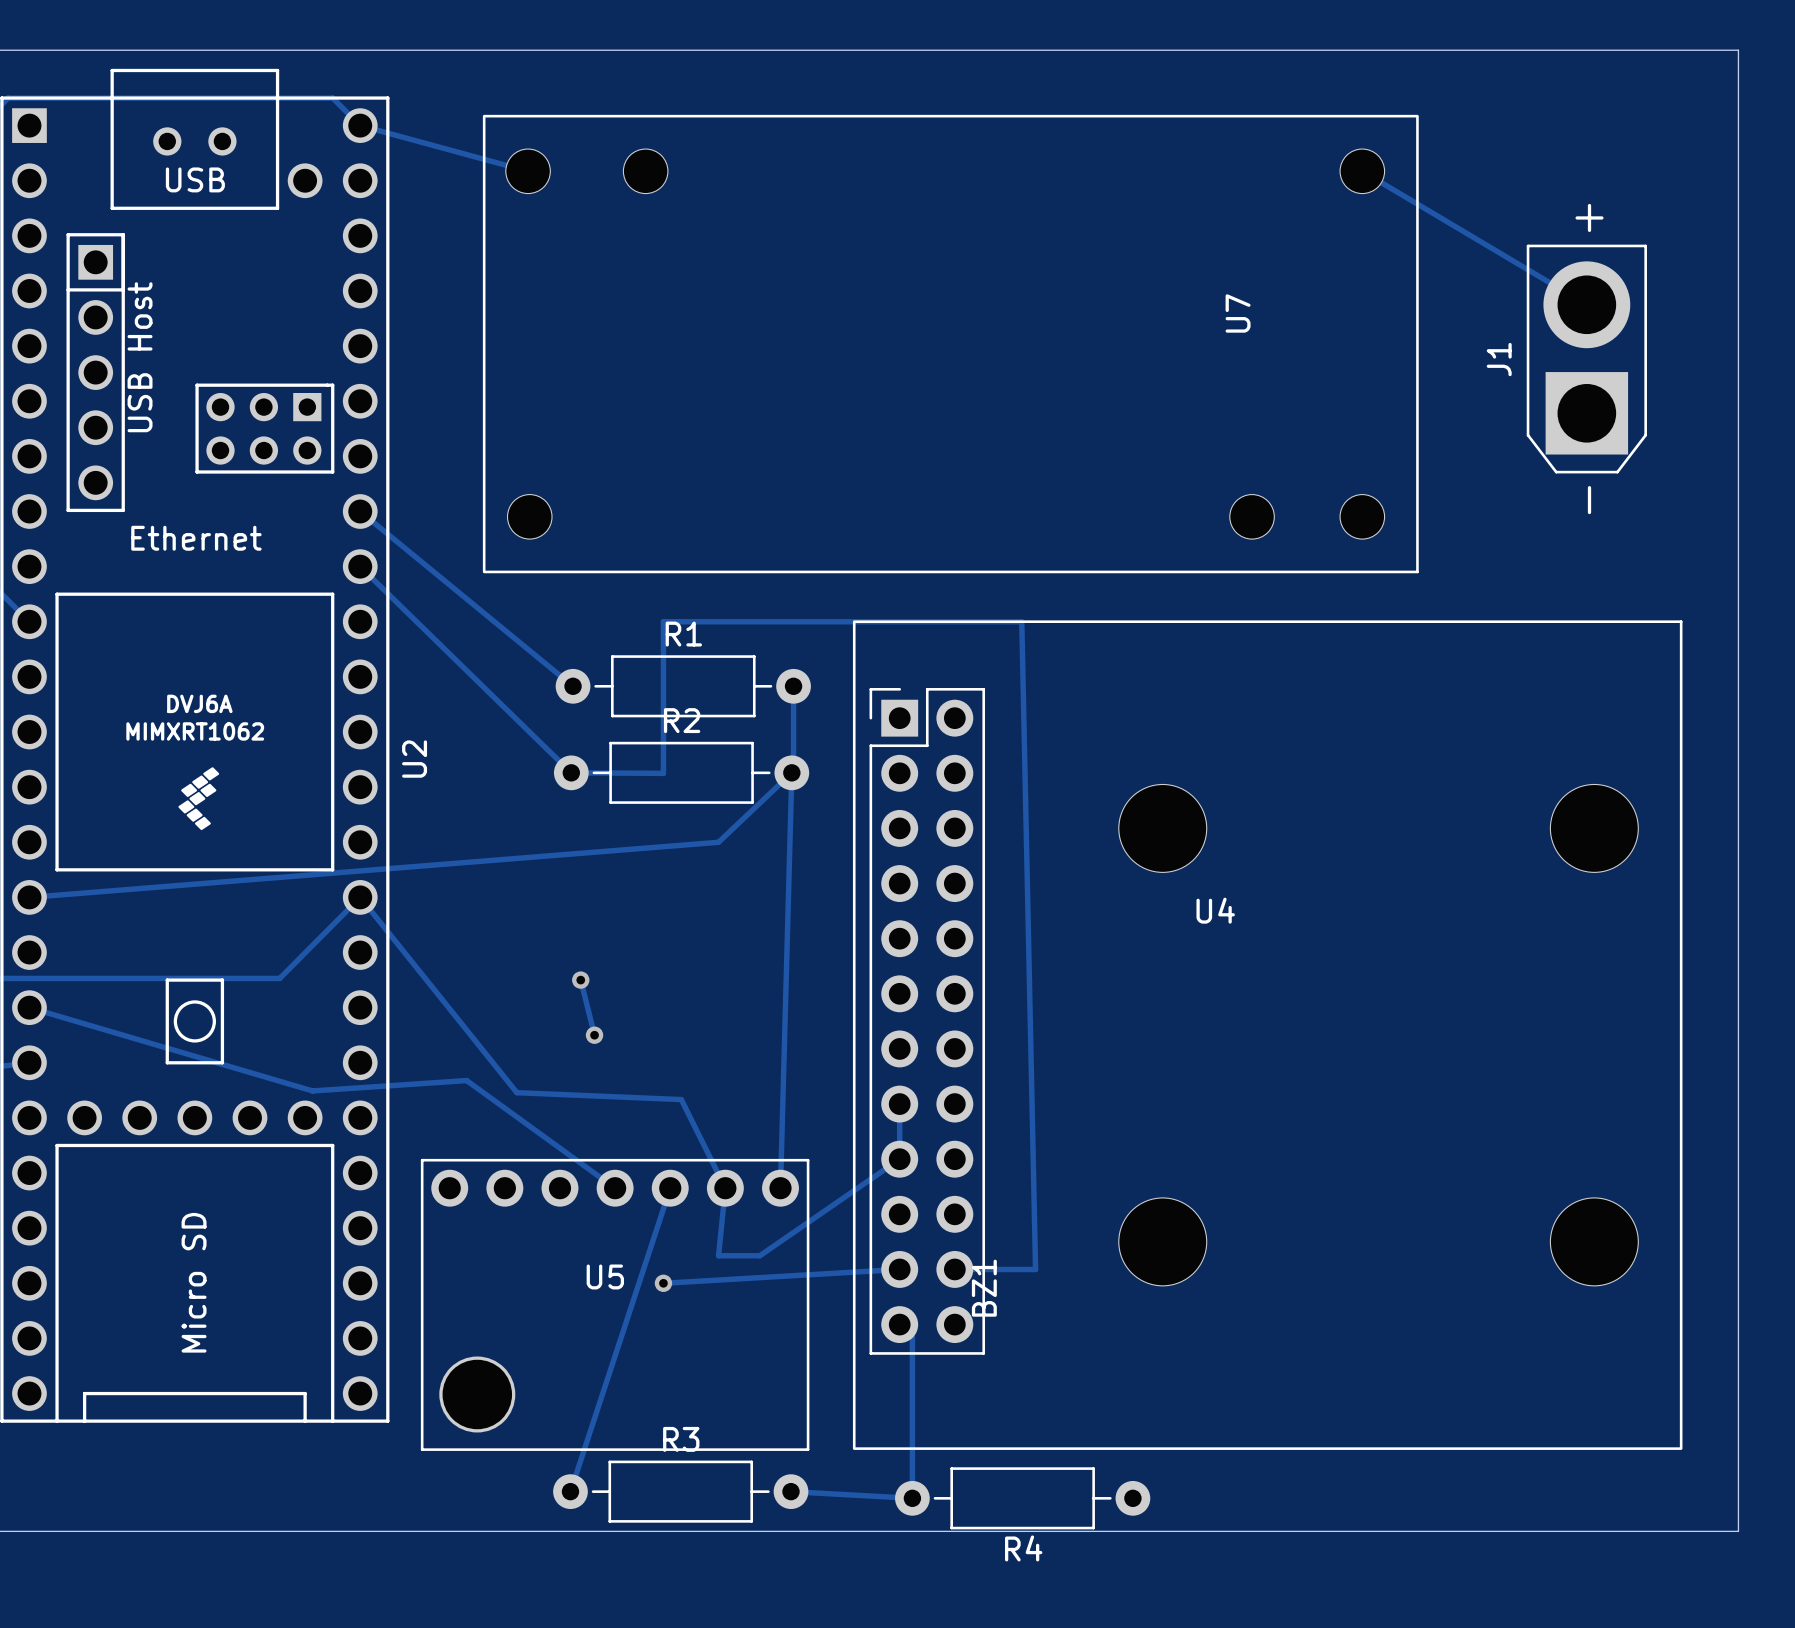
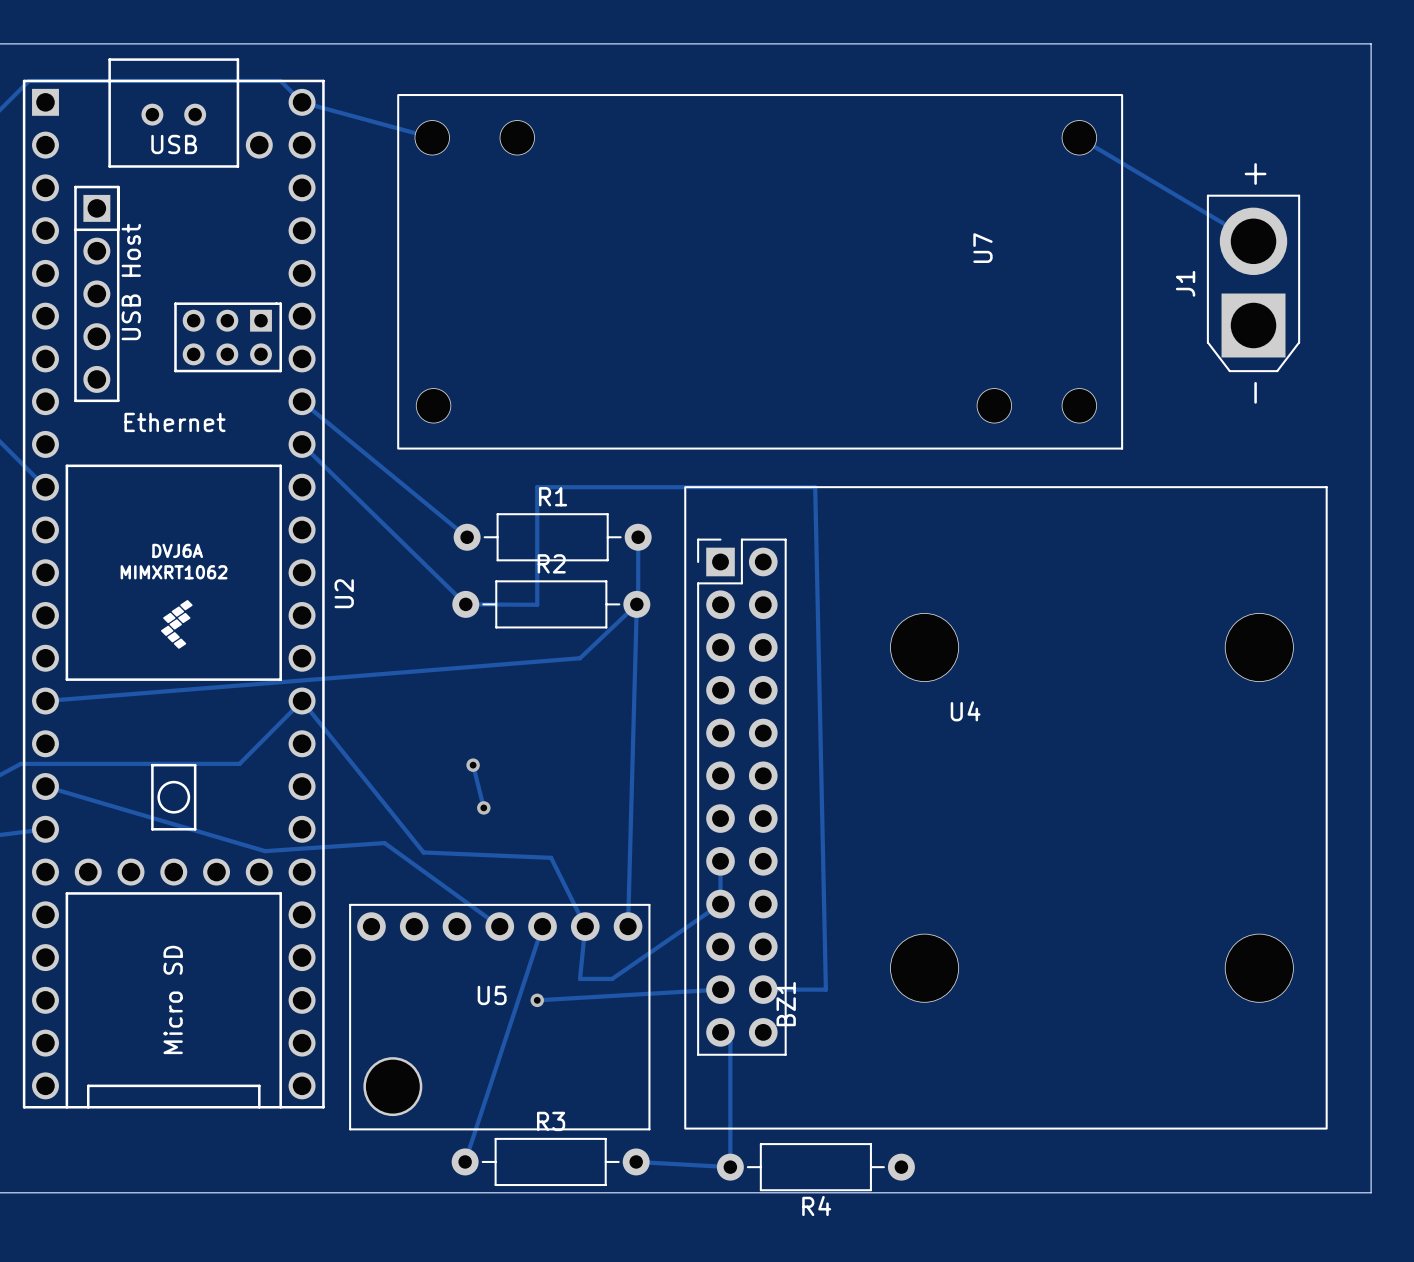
U7 footprint: [482, 114, 1419, 574] -> [397, 94, 1124, 450]

